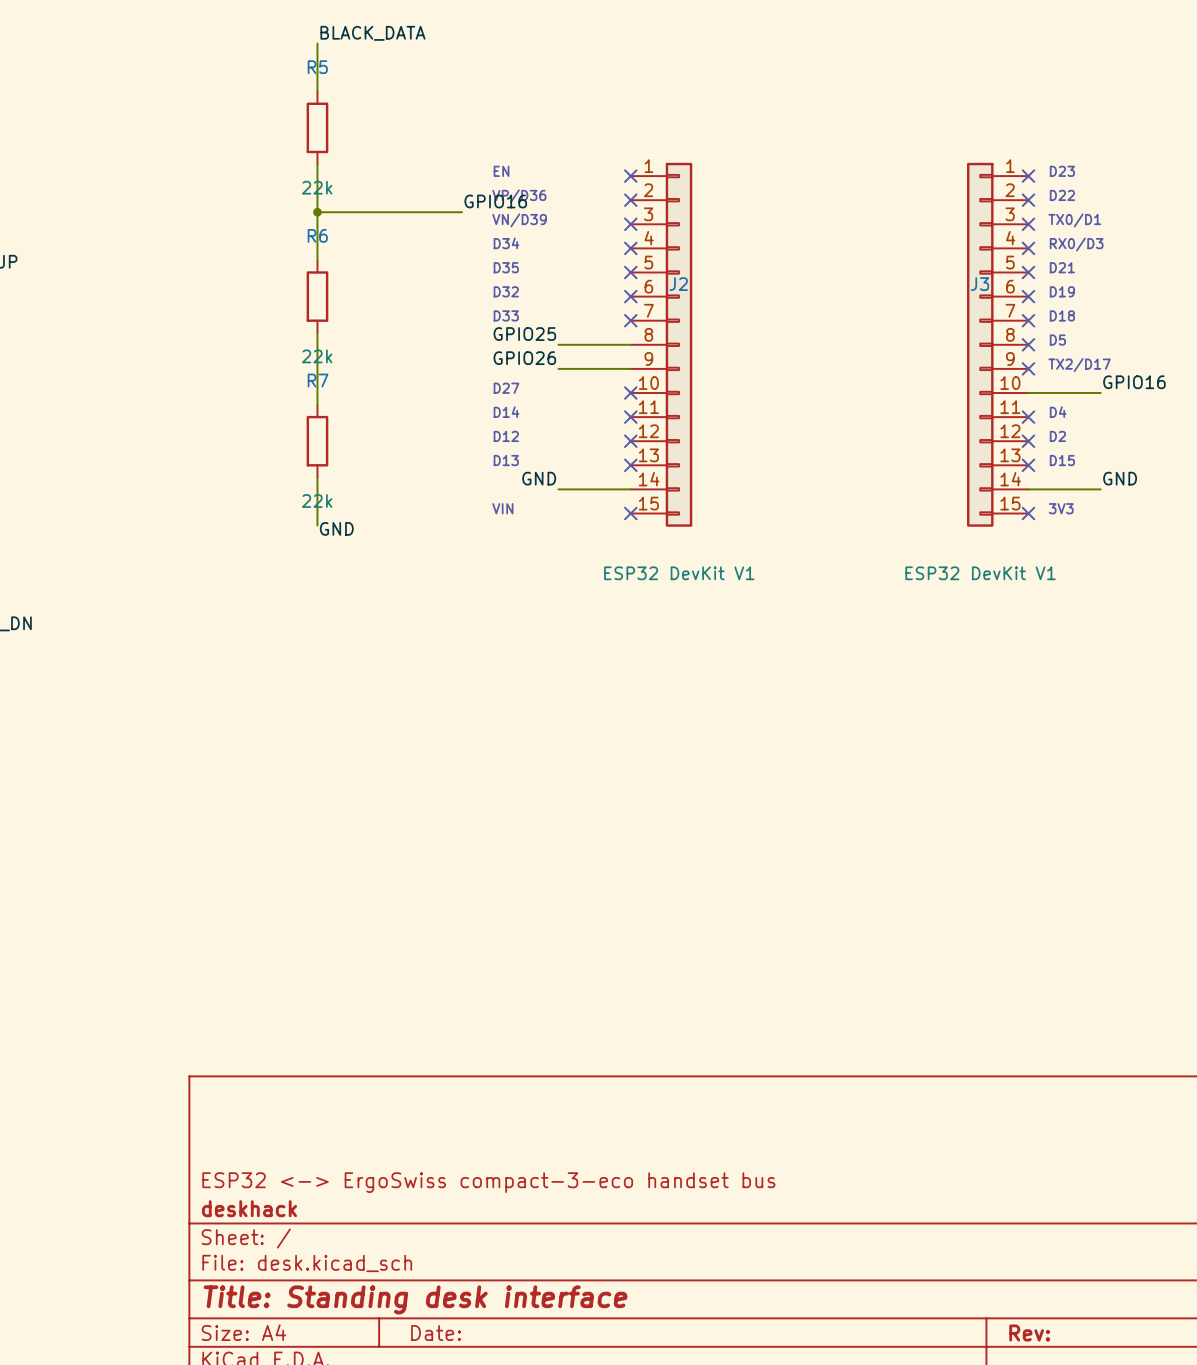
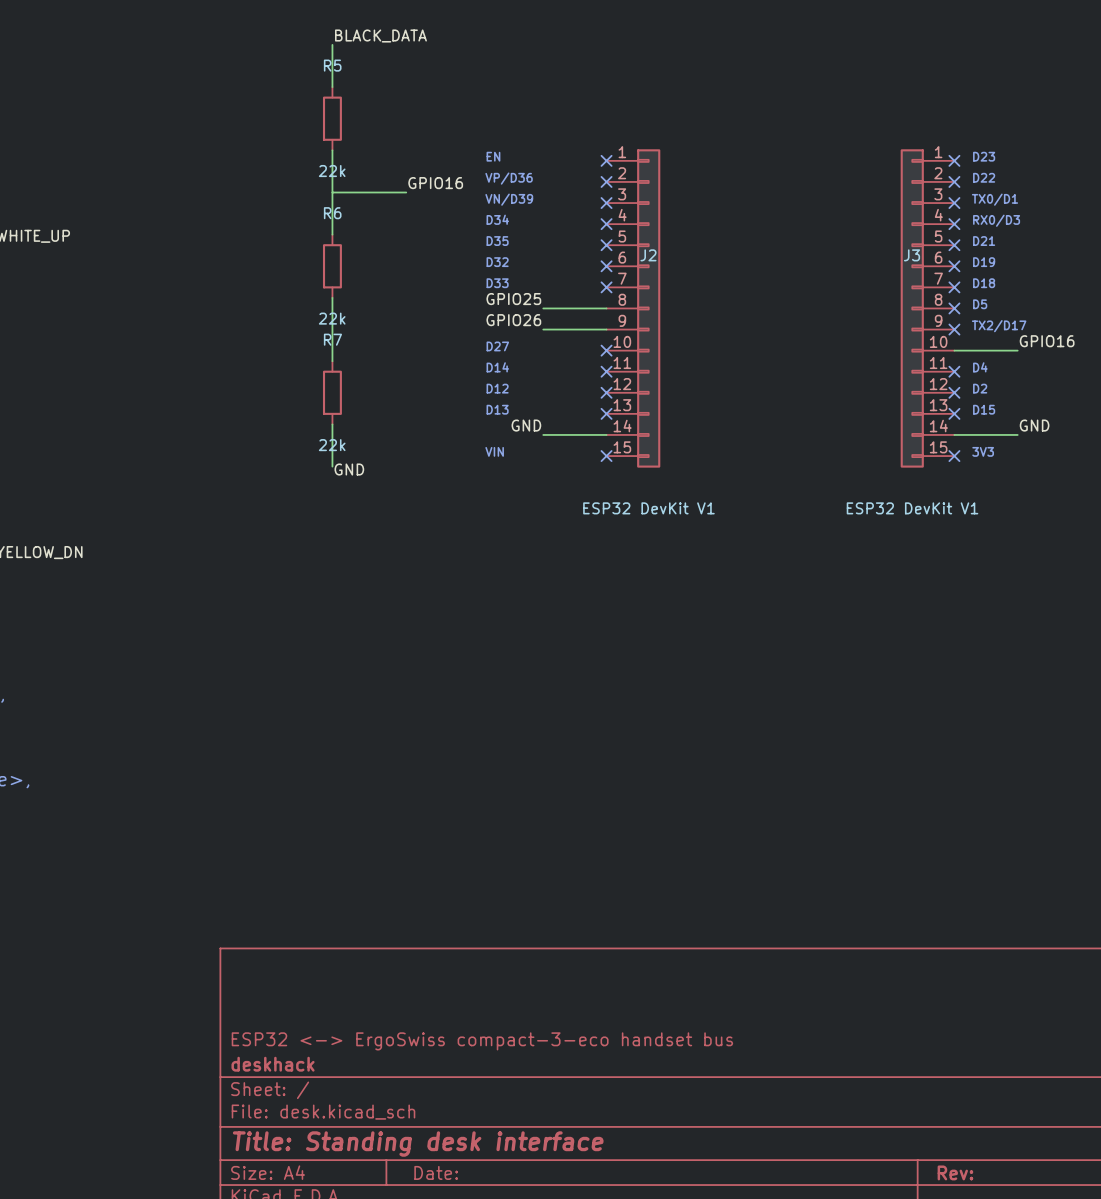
label position: GPIO16 (495, 201) -> GPIO16 (435, 183)
junction: (317, 212) -> none
wire: (401, 212) (462, 212) -> none

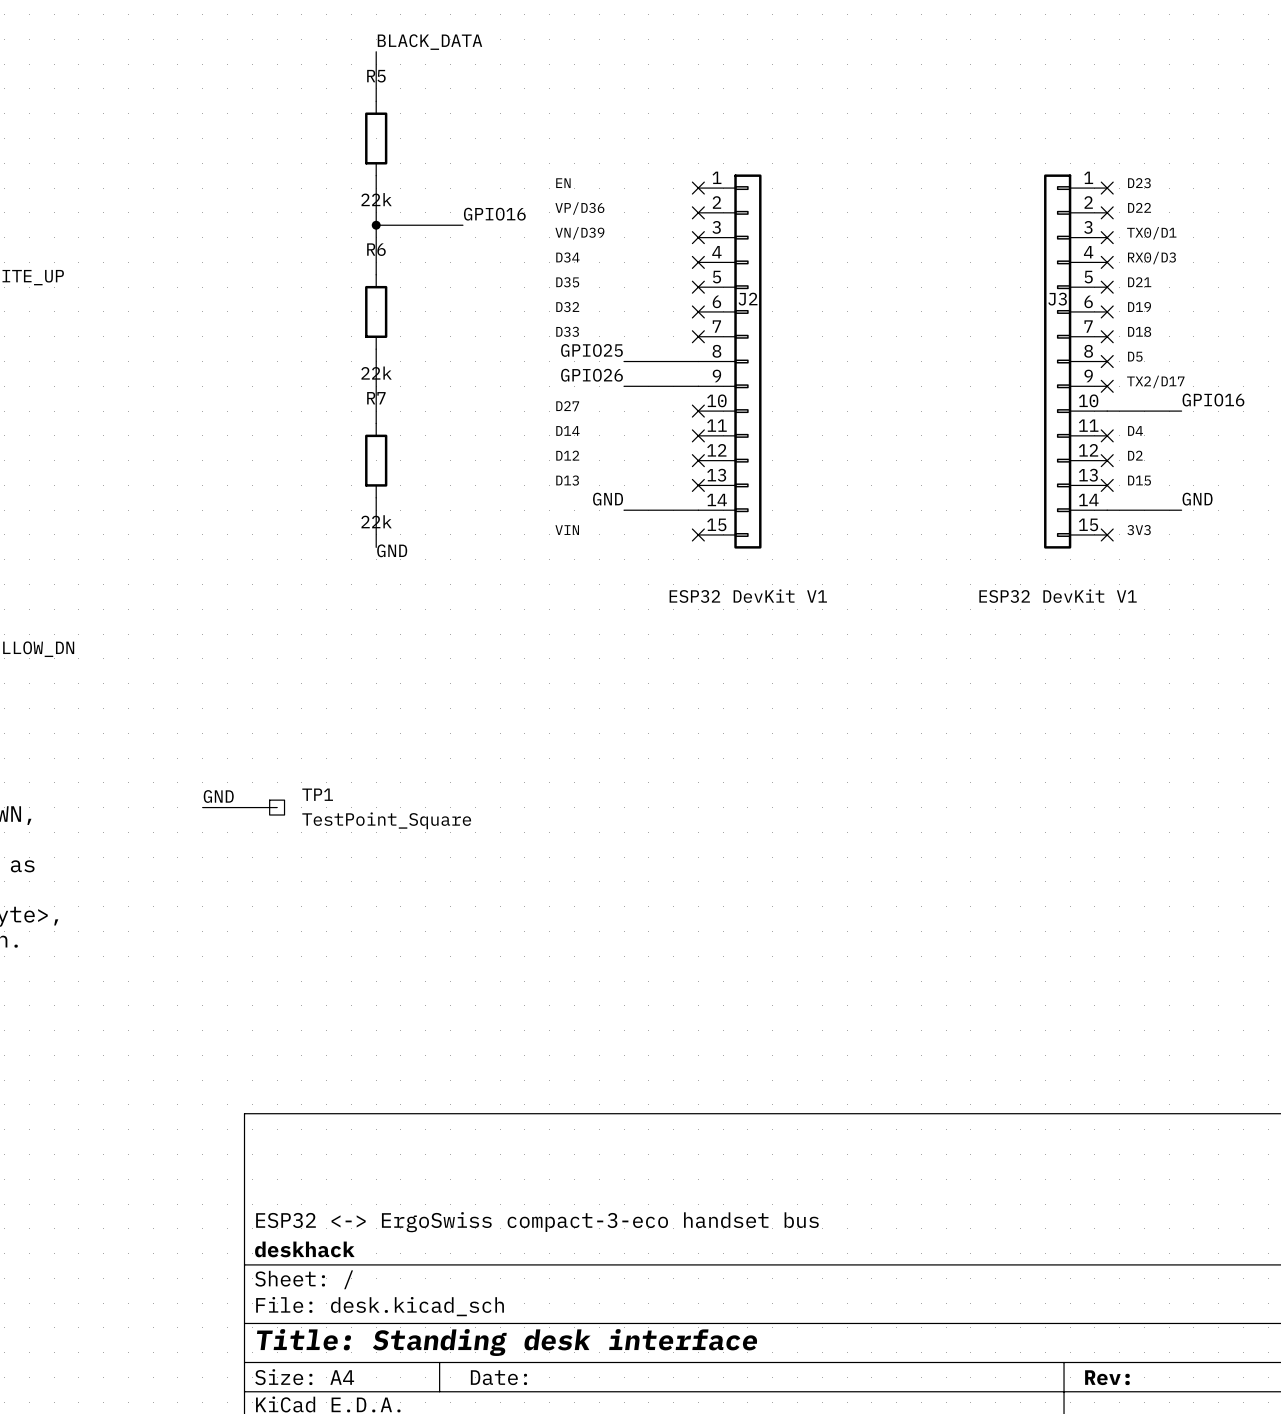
junction: none -> (376, 225)
label: none -> GND (218, 796)
wire: none -> (202, 807) (277, 807)
TP1: none -> TestPoint_Square (277, 807)

